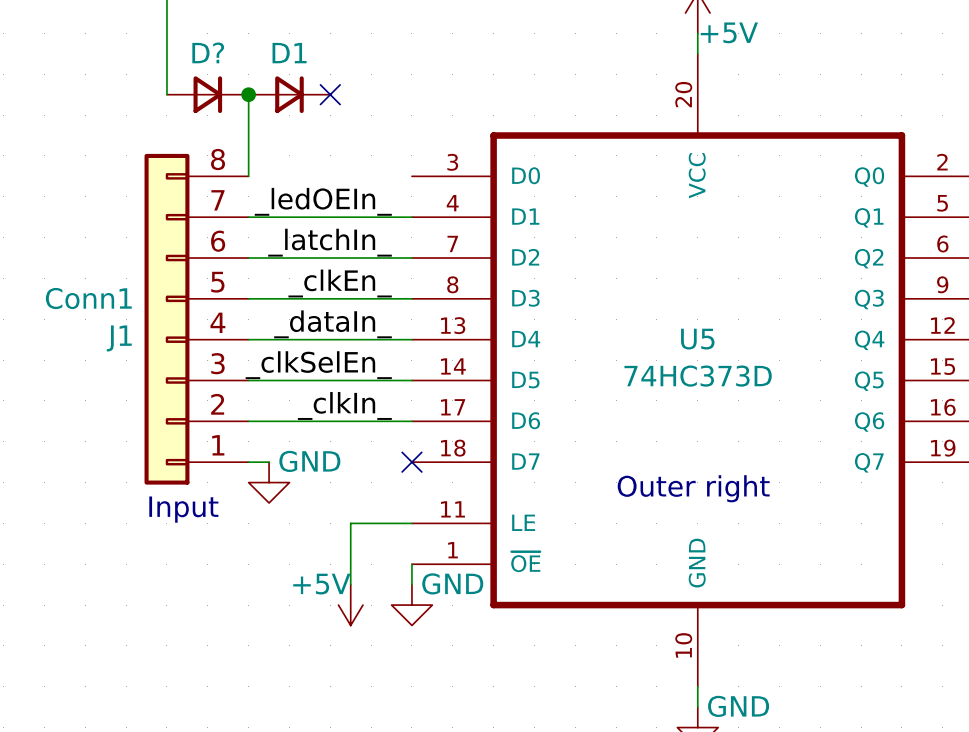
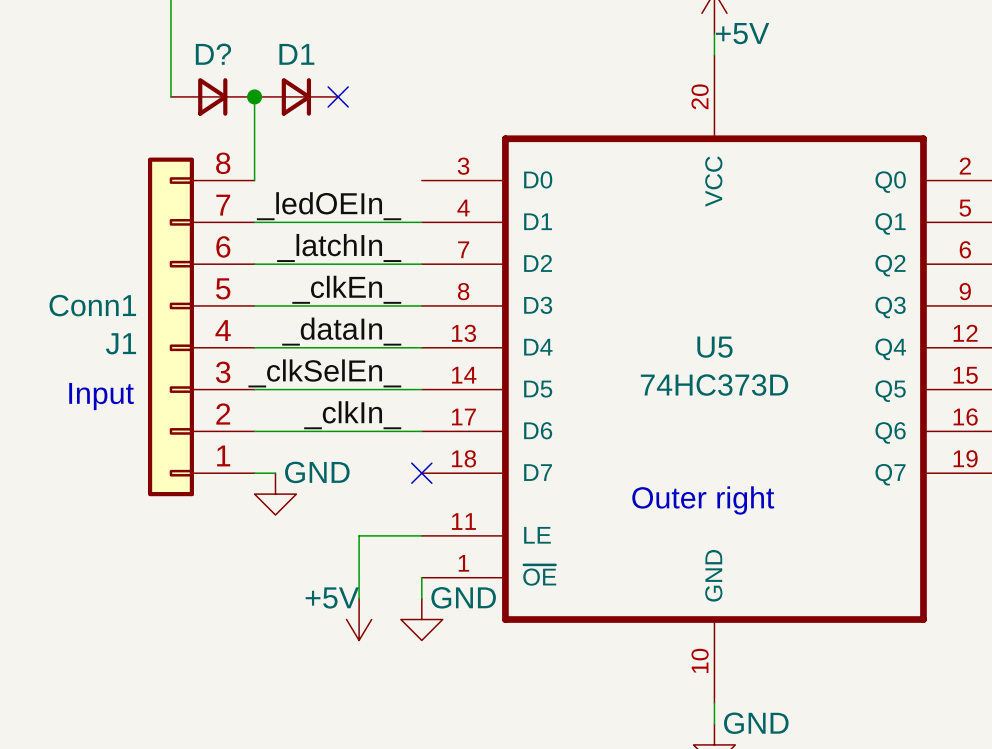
text position: Input (183, 509) -> Input (101, 396)

